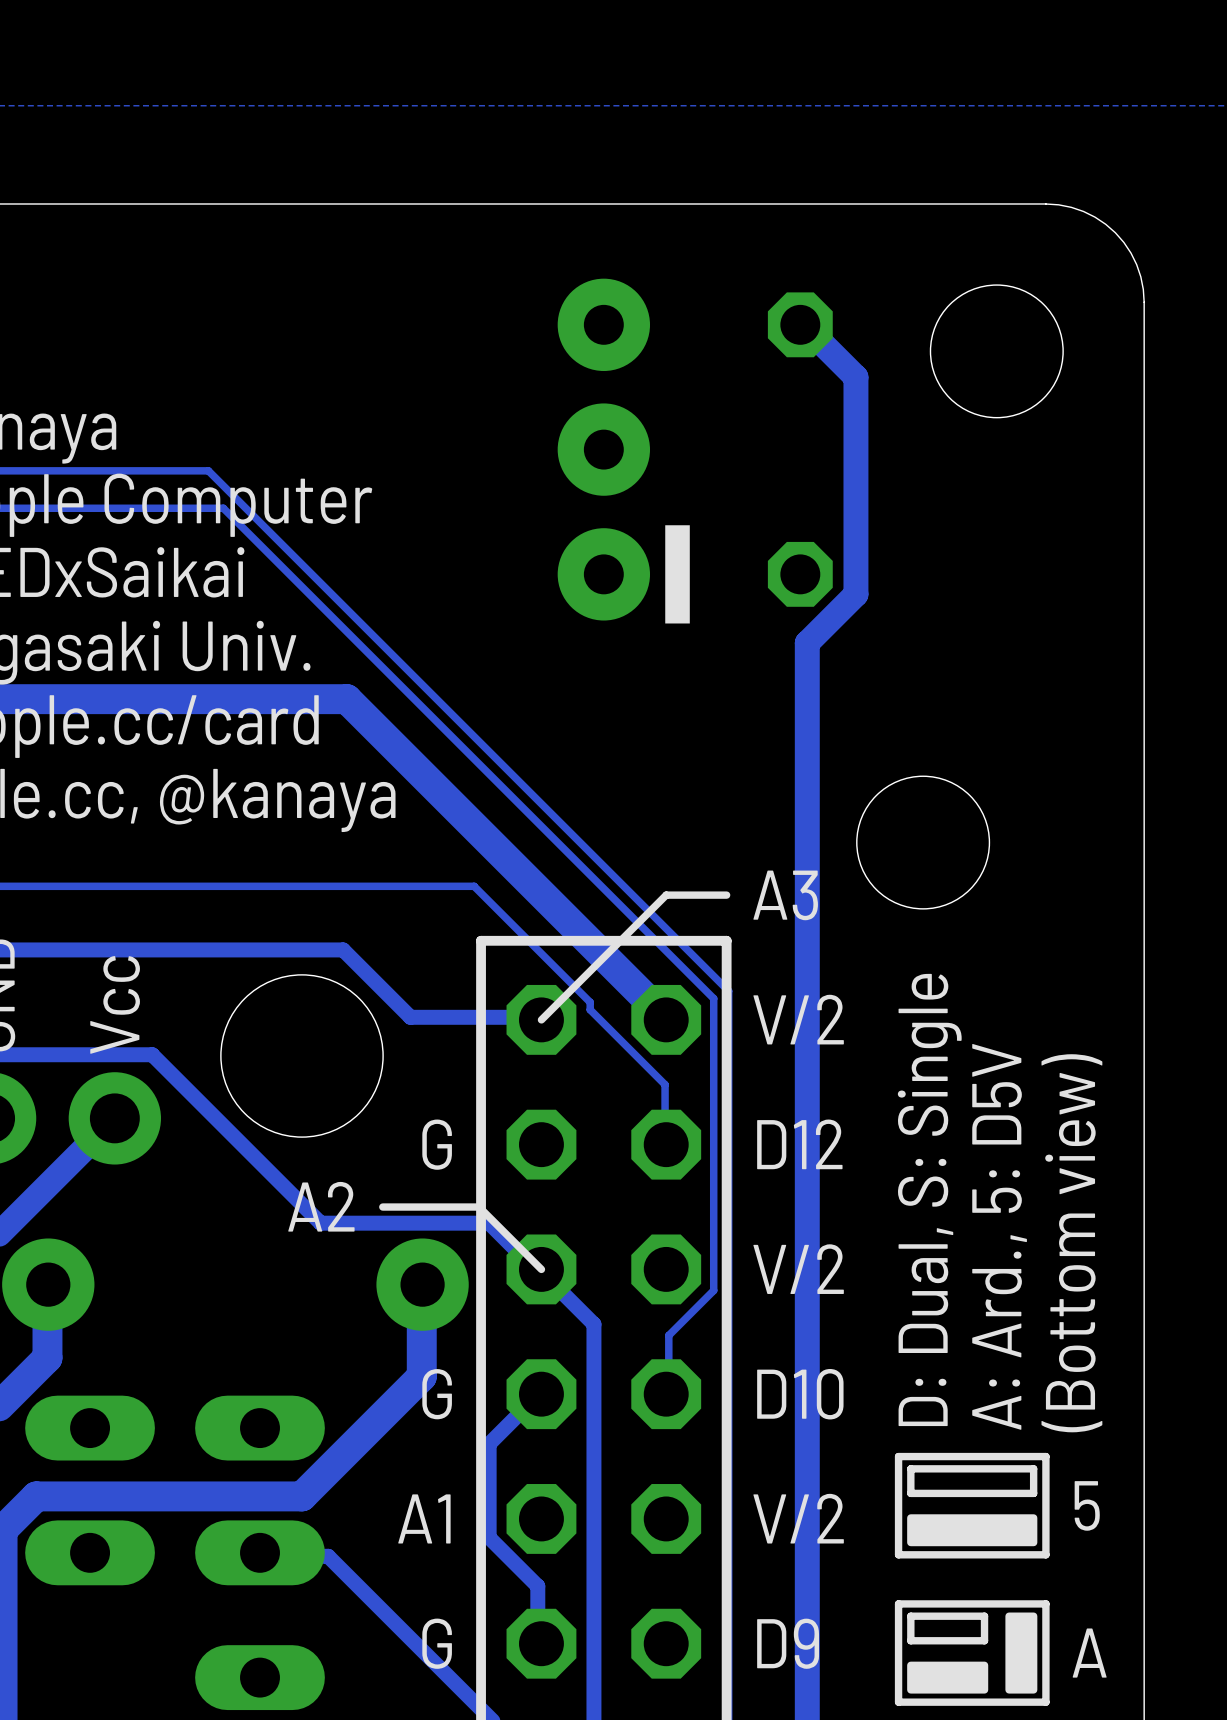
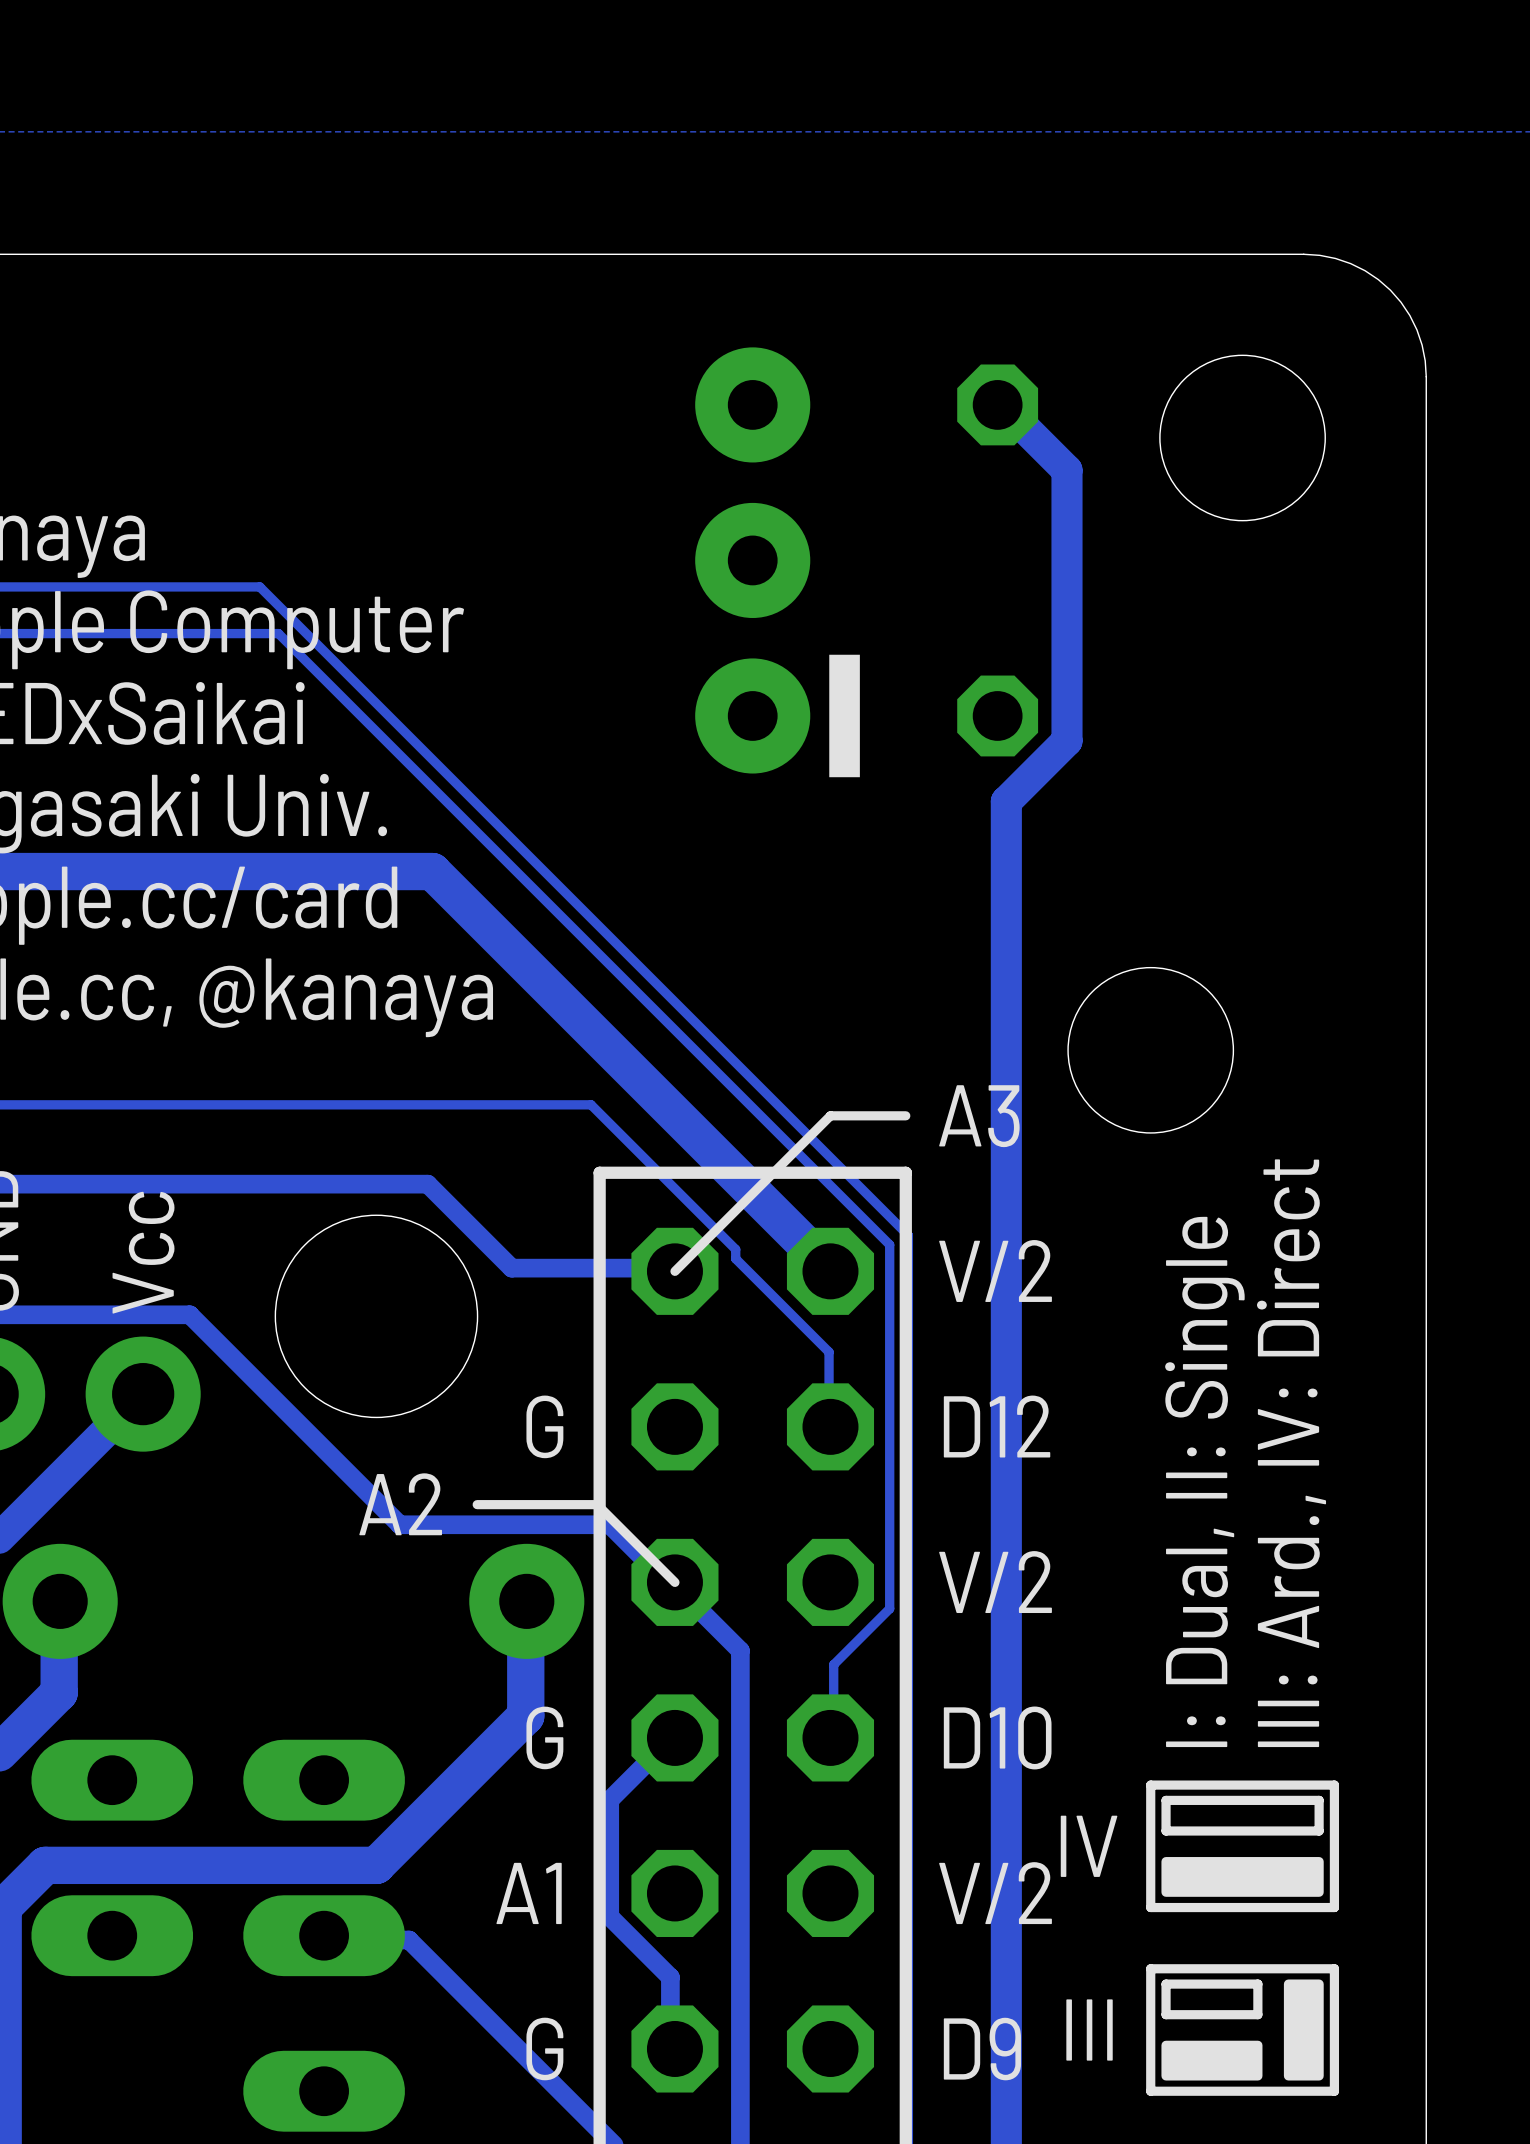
text: D: Dual, S: Single (929, 1199) -> I: Dual, II: Single (1204, 1481)
text: A: Ard., 5: D5V (999, 1236) -> III: Ard., IV: Direct (1291, 1453)
text: (Bottom view) (1071, 1243) -> none
line: (1045, 1456) (1045, 1554) (898, 1554) (898, 1456) (1045, 1456) -> (1334, 1785) (1334, 1907) (1150, 1907) (1150, 1785) (1334, 1785)
line: (1033, 1468) (1033, 1493) (910, 1493) (910, 1468) (935, 1468) -> (1288, 1831) (1319, 1831) (1319, 1800) (1166, 1800) (1166, 1831)
text: none -> IV (1089, 1846)
text: 5 (1087, 1505) -> none
drawing position: (972, 1530) -> (1242, 1876)
line: (1045, 1603) (1045, 1702) (898, 1702) (898, 1603) (1045, 1603) -> (1334, 1968) (1334, 2091) (1150, 2091) (1150, 1968) (1334, 1968)
line: (984, 1616) (984, 1640) (910, 1640) (910, 1616) (935, 1616) -> (1227, 2014) (1257, 2014) (1257, 1984) (1166, 1984) (1166, 2014)
text: none -> III (1089, 2030)
drawing position: (1021, 1653) -> (1303, 2030)
text: A (1089, 1653) -> none
drawing position: (947, 1677) -> (1211, 2060)

